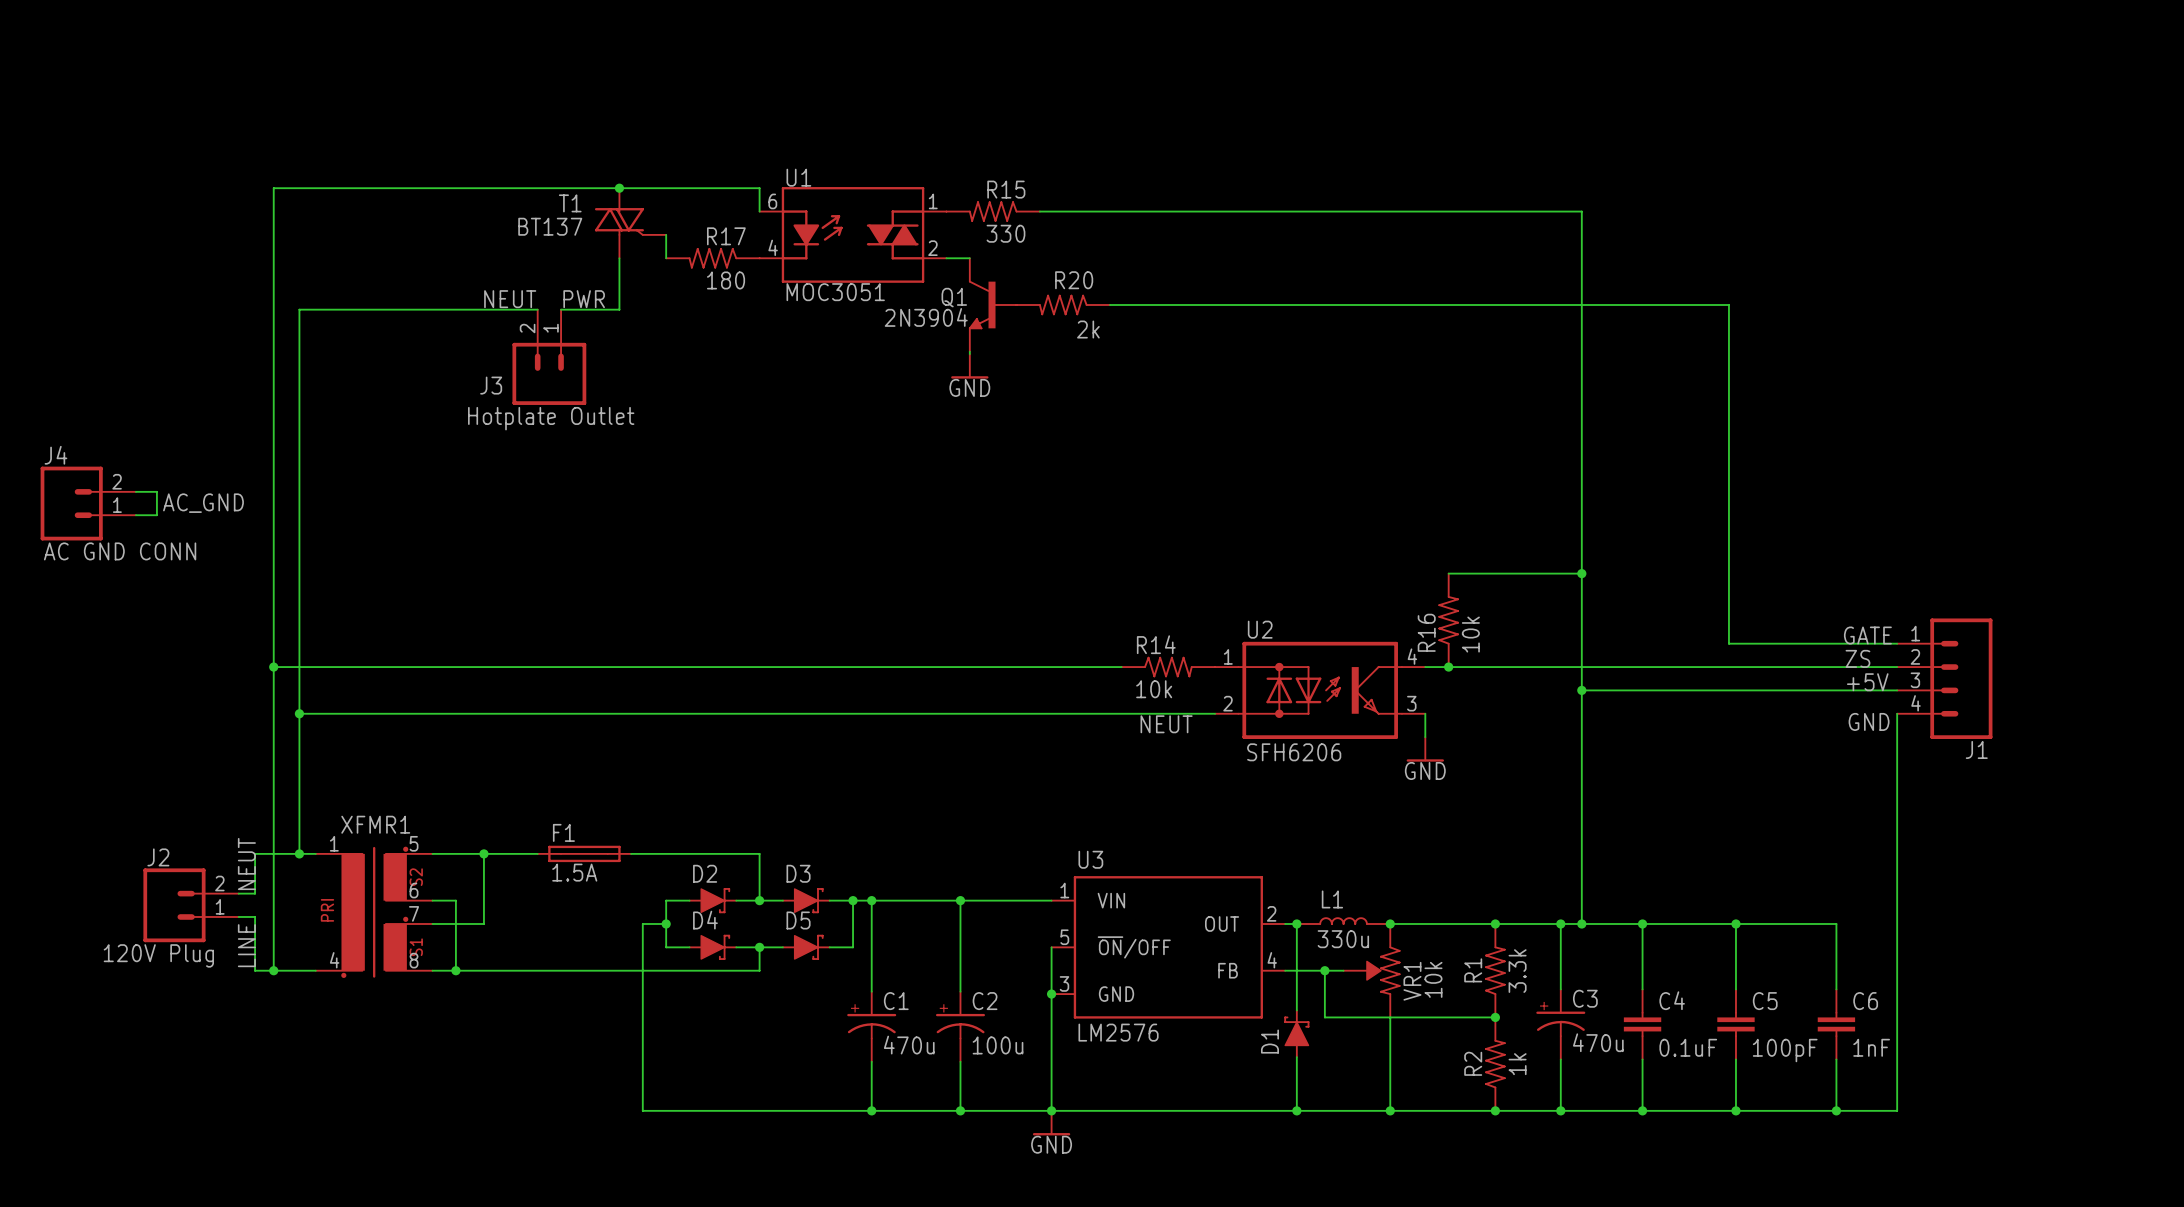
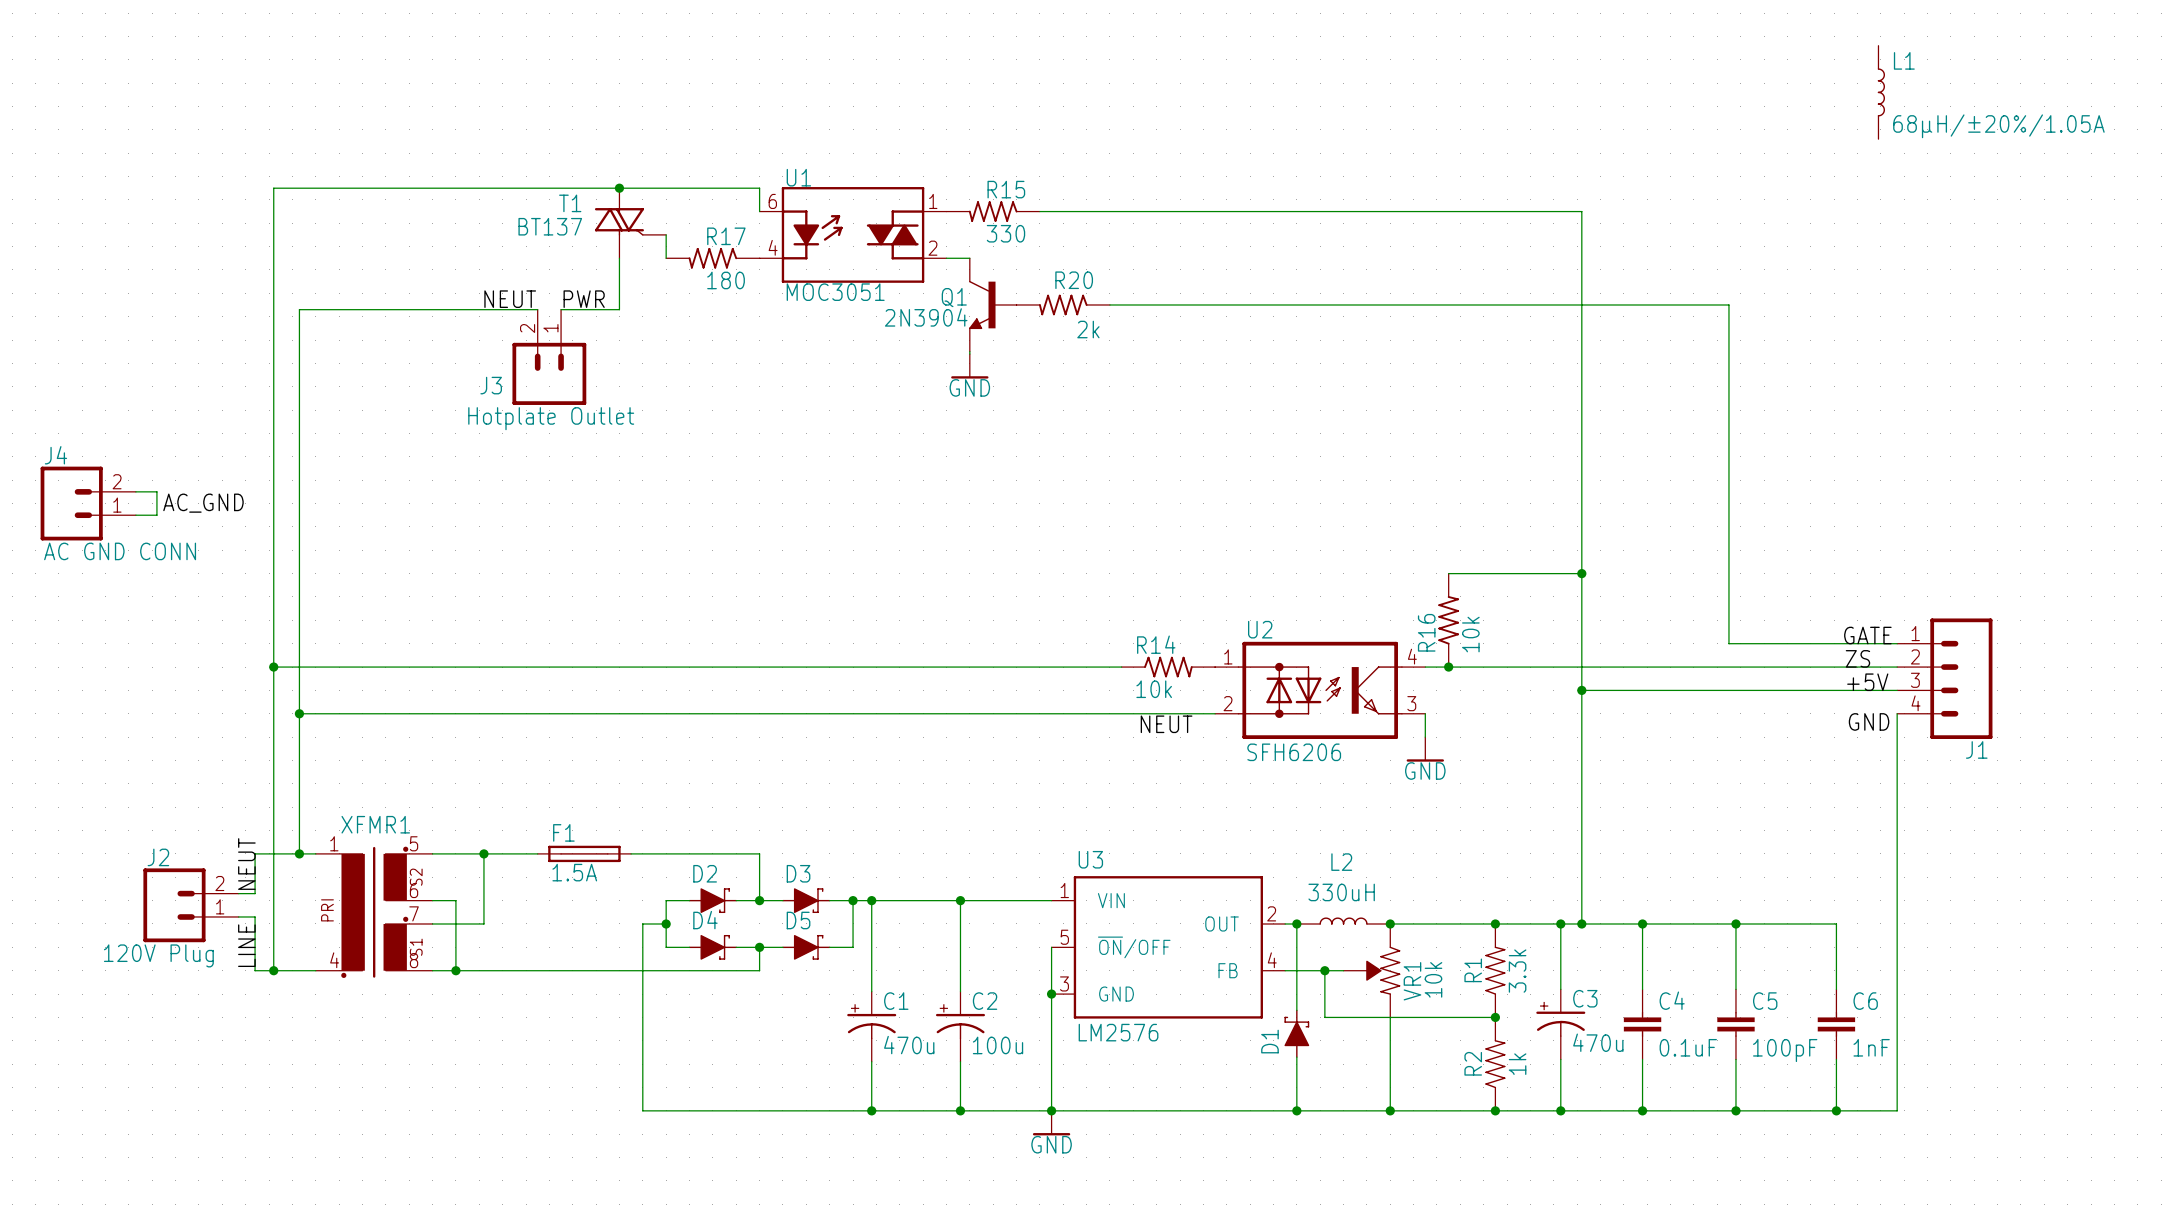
L1: none -> 68µH/±20%/1.05A (1881, 92)
L1 value: none -> 330uH (1341, 892)
L1 name: L1 (1332, 899) -> L2 (1341, 862)
text: 330u (1343, 939) -> none

